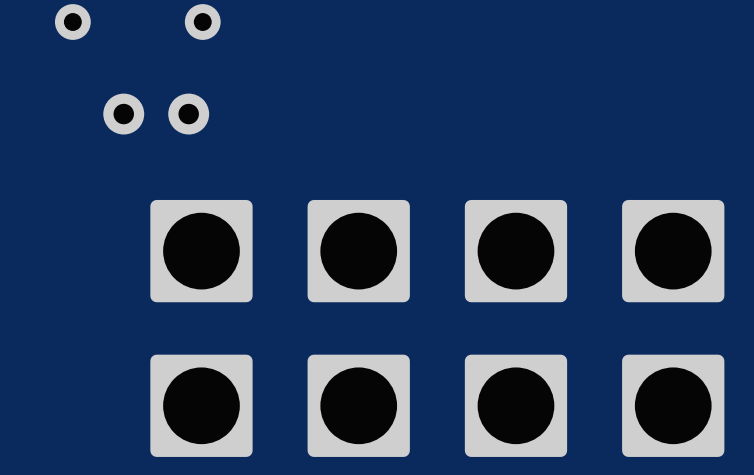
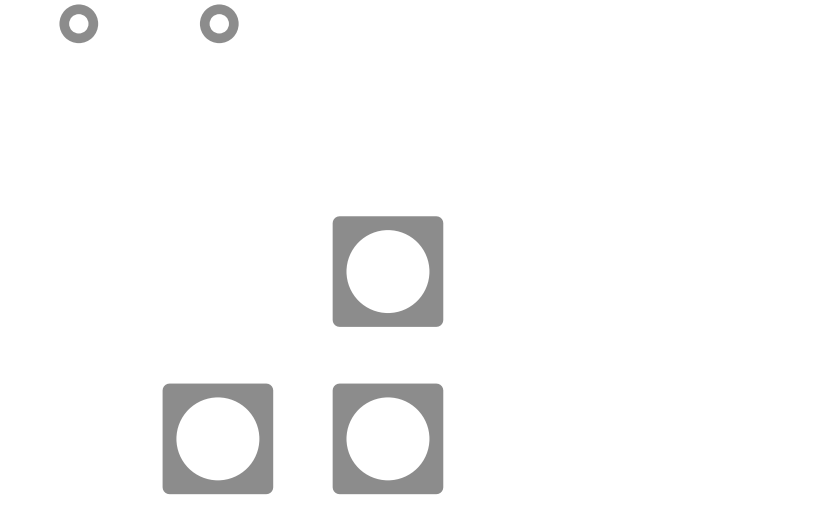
part: (156, 114) -> none
part: (201, 251) -> none
part: (515, 251) -> none
part: (673, 251) -> none
part: (515, 405) -> none
part: (673, 405) -> none

